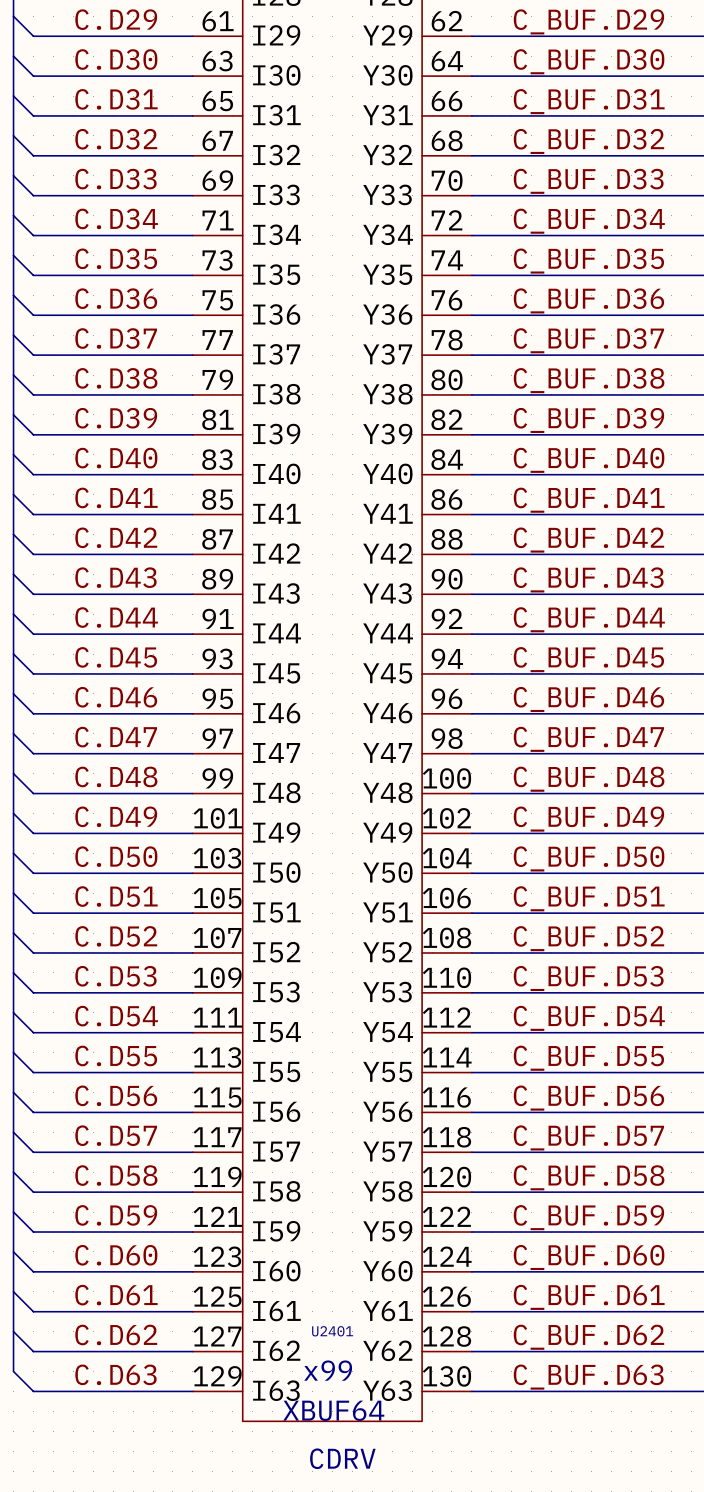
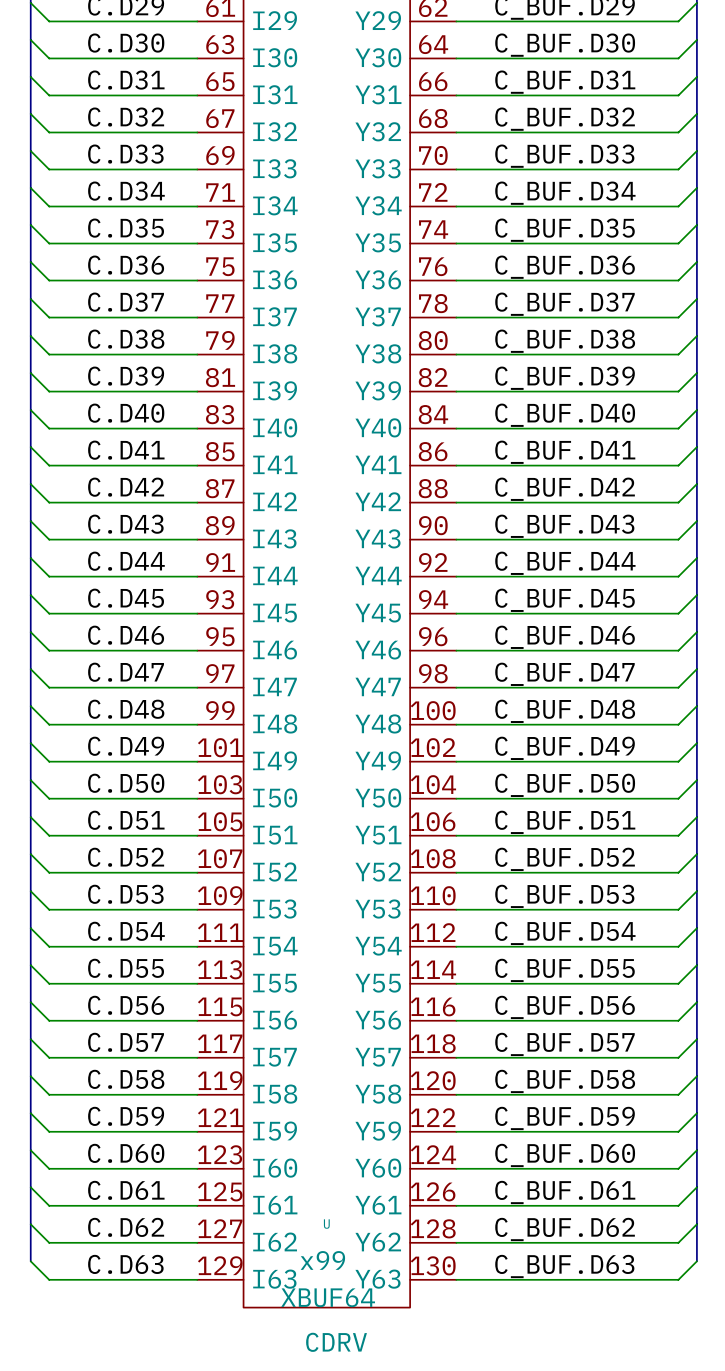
U2401 name: U2401 (332, 1331) -> U (326, 1224)

